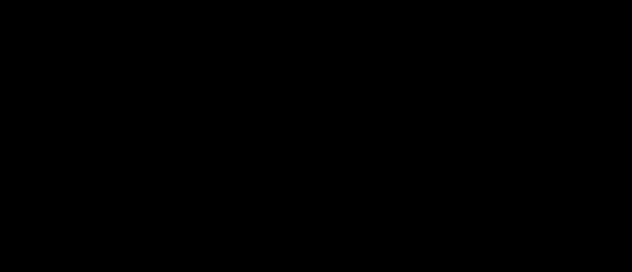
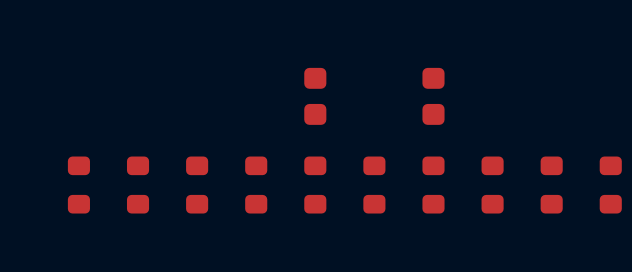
part: none -> (315, 96)
part: none -> (433, 96)
part: none -> (78, 185)
part: none -> (138, 185)
part: none -> (197, 185)
part: none -> (256, 185)
part: none -> (315, 185)
part: none -> (374, 185)
part: none -> (433, 185)
part: none -> (492, 185)
part: none -> (551, 185)
part: none -> (610, 185)

